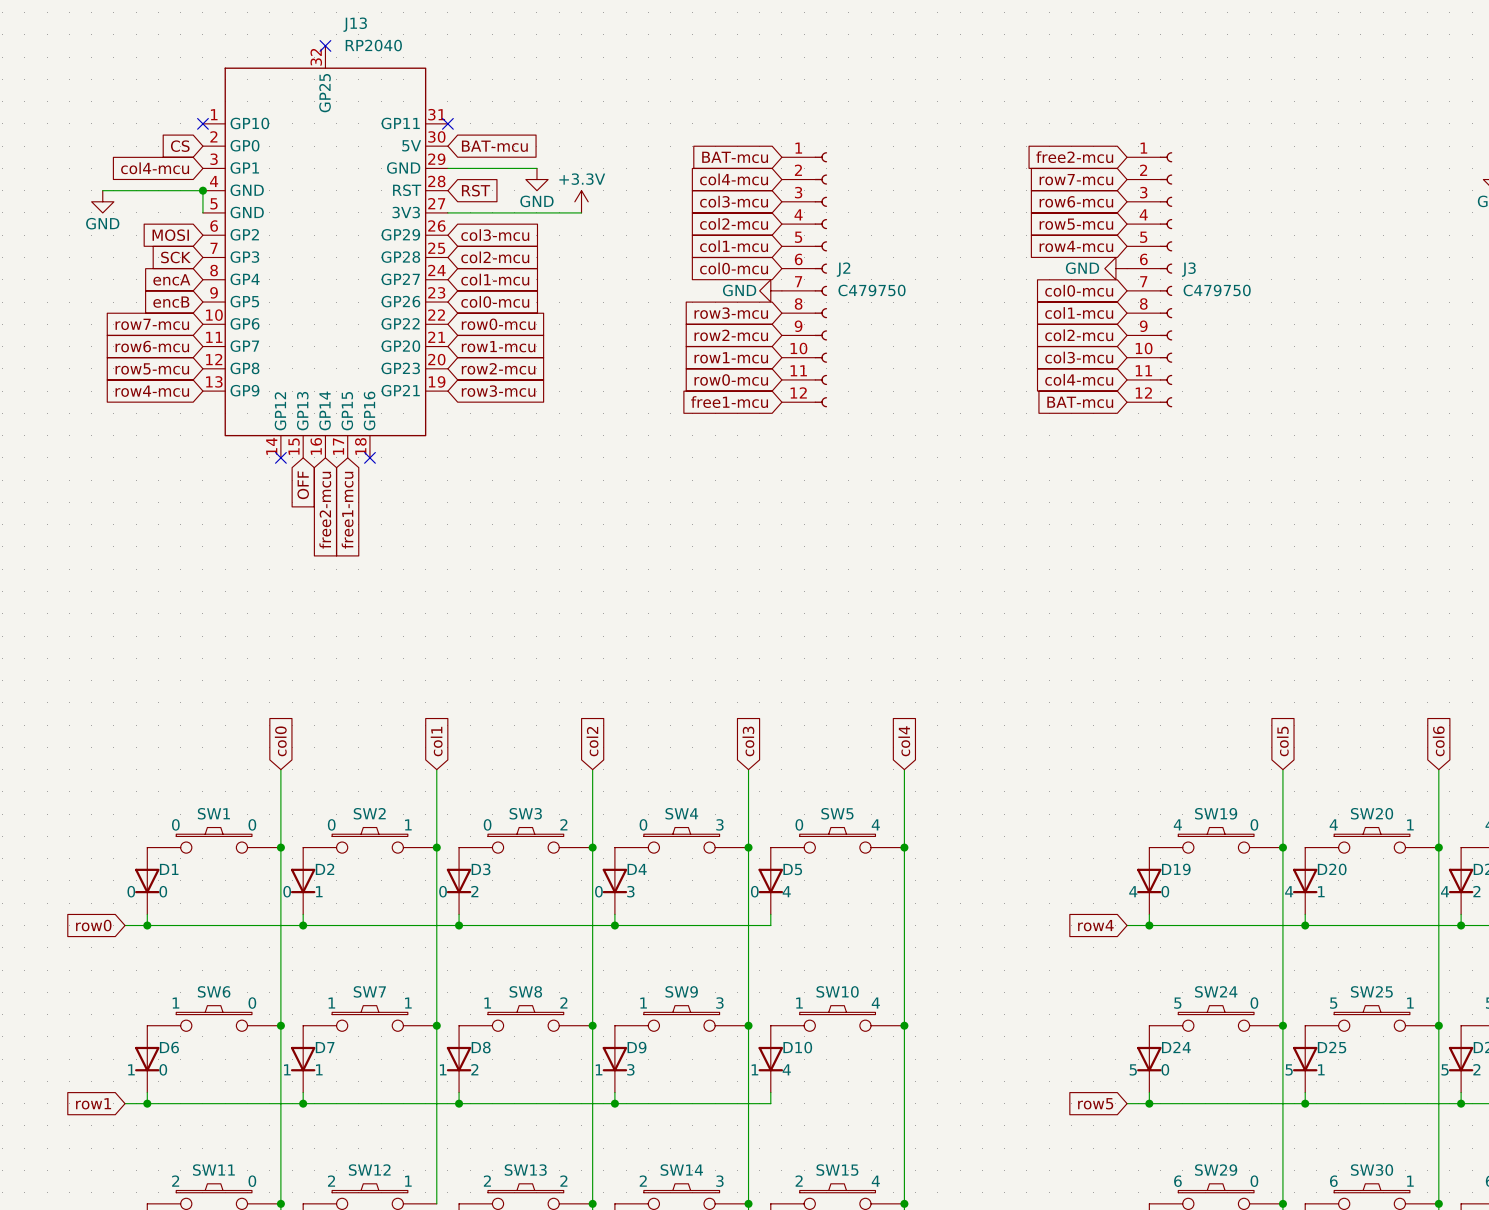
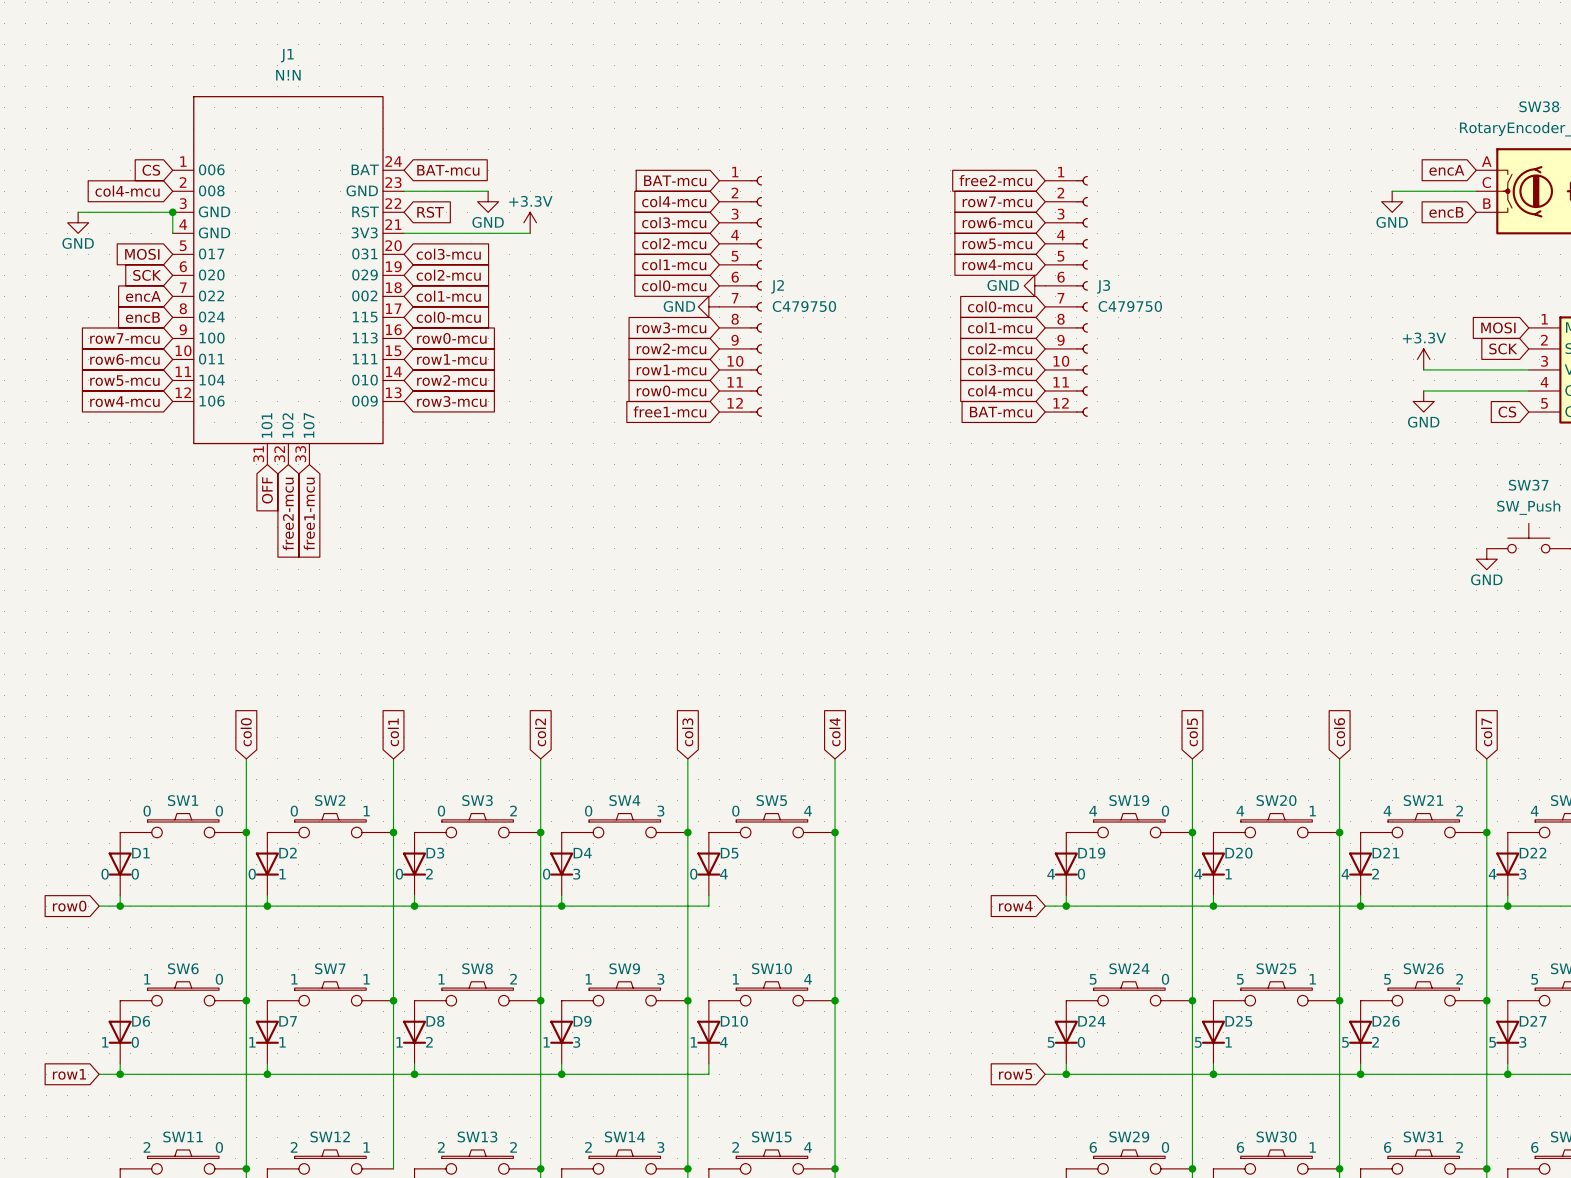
no-connect mark: (325, 45) -> none
no-connect mark: (202, 123) -> none
no-connect mark: (447, 123) -> none
J13: RP2040 (325, 251) -> none
J1: none -> N!N (288, 280)
no-connect mark: (280, 457) -> none
no-connect mark: (369, 457) -> none

